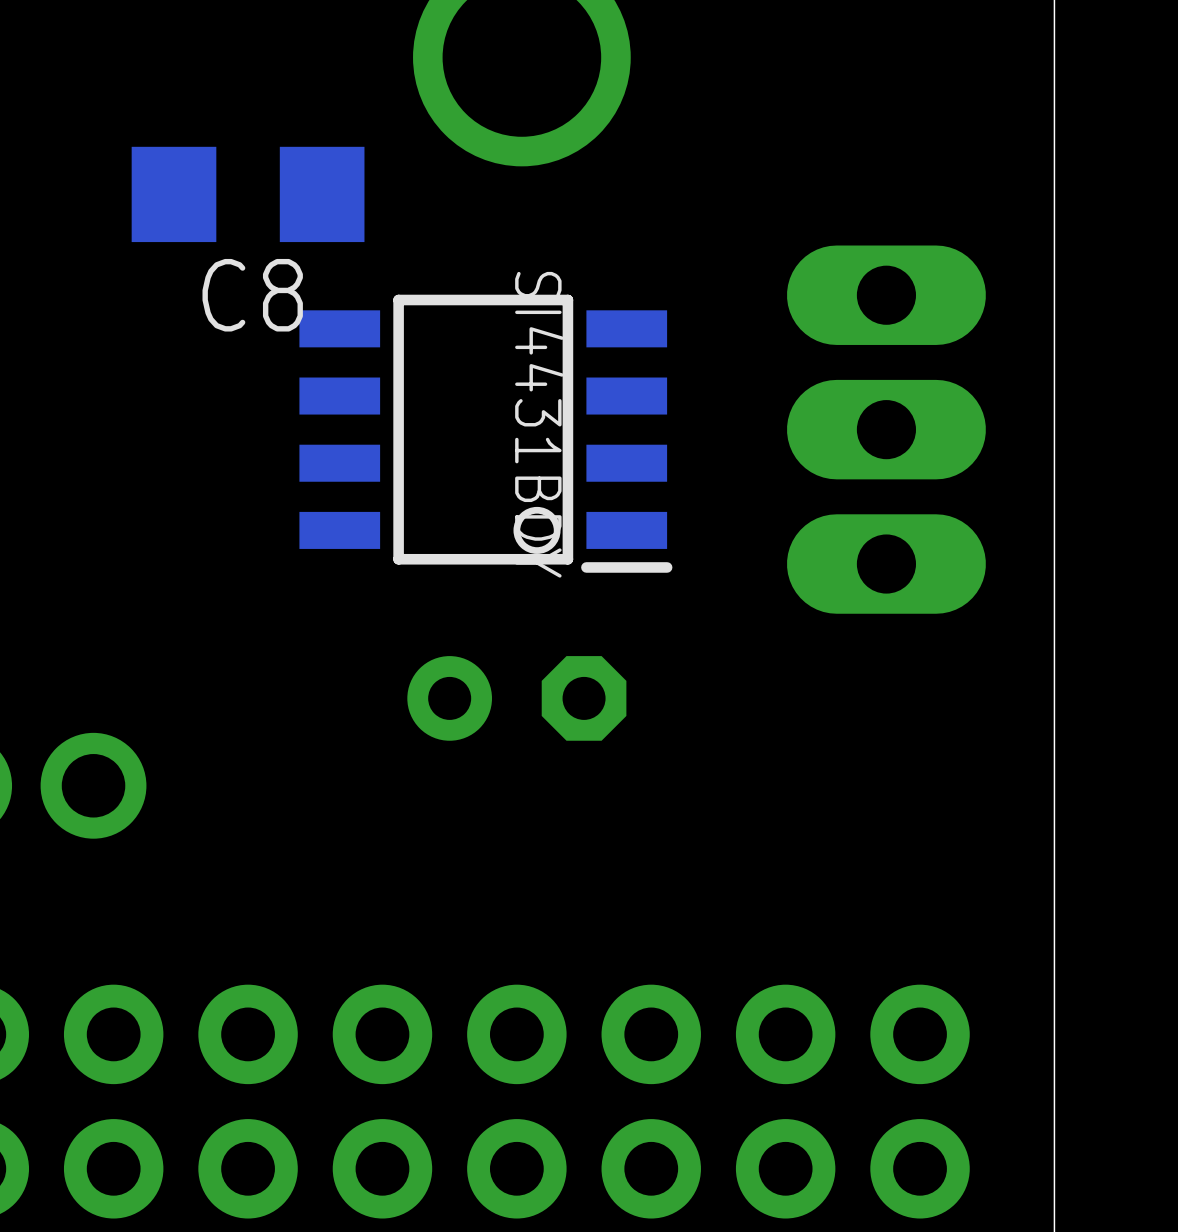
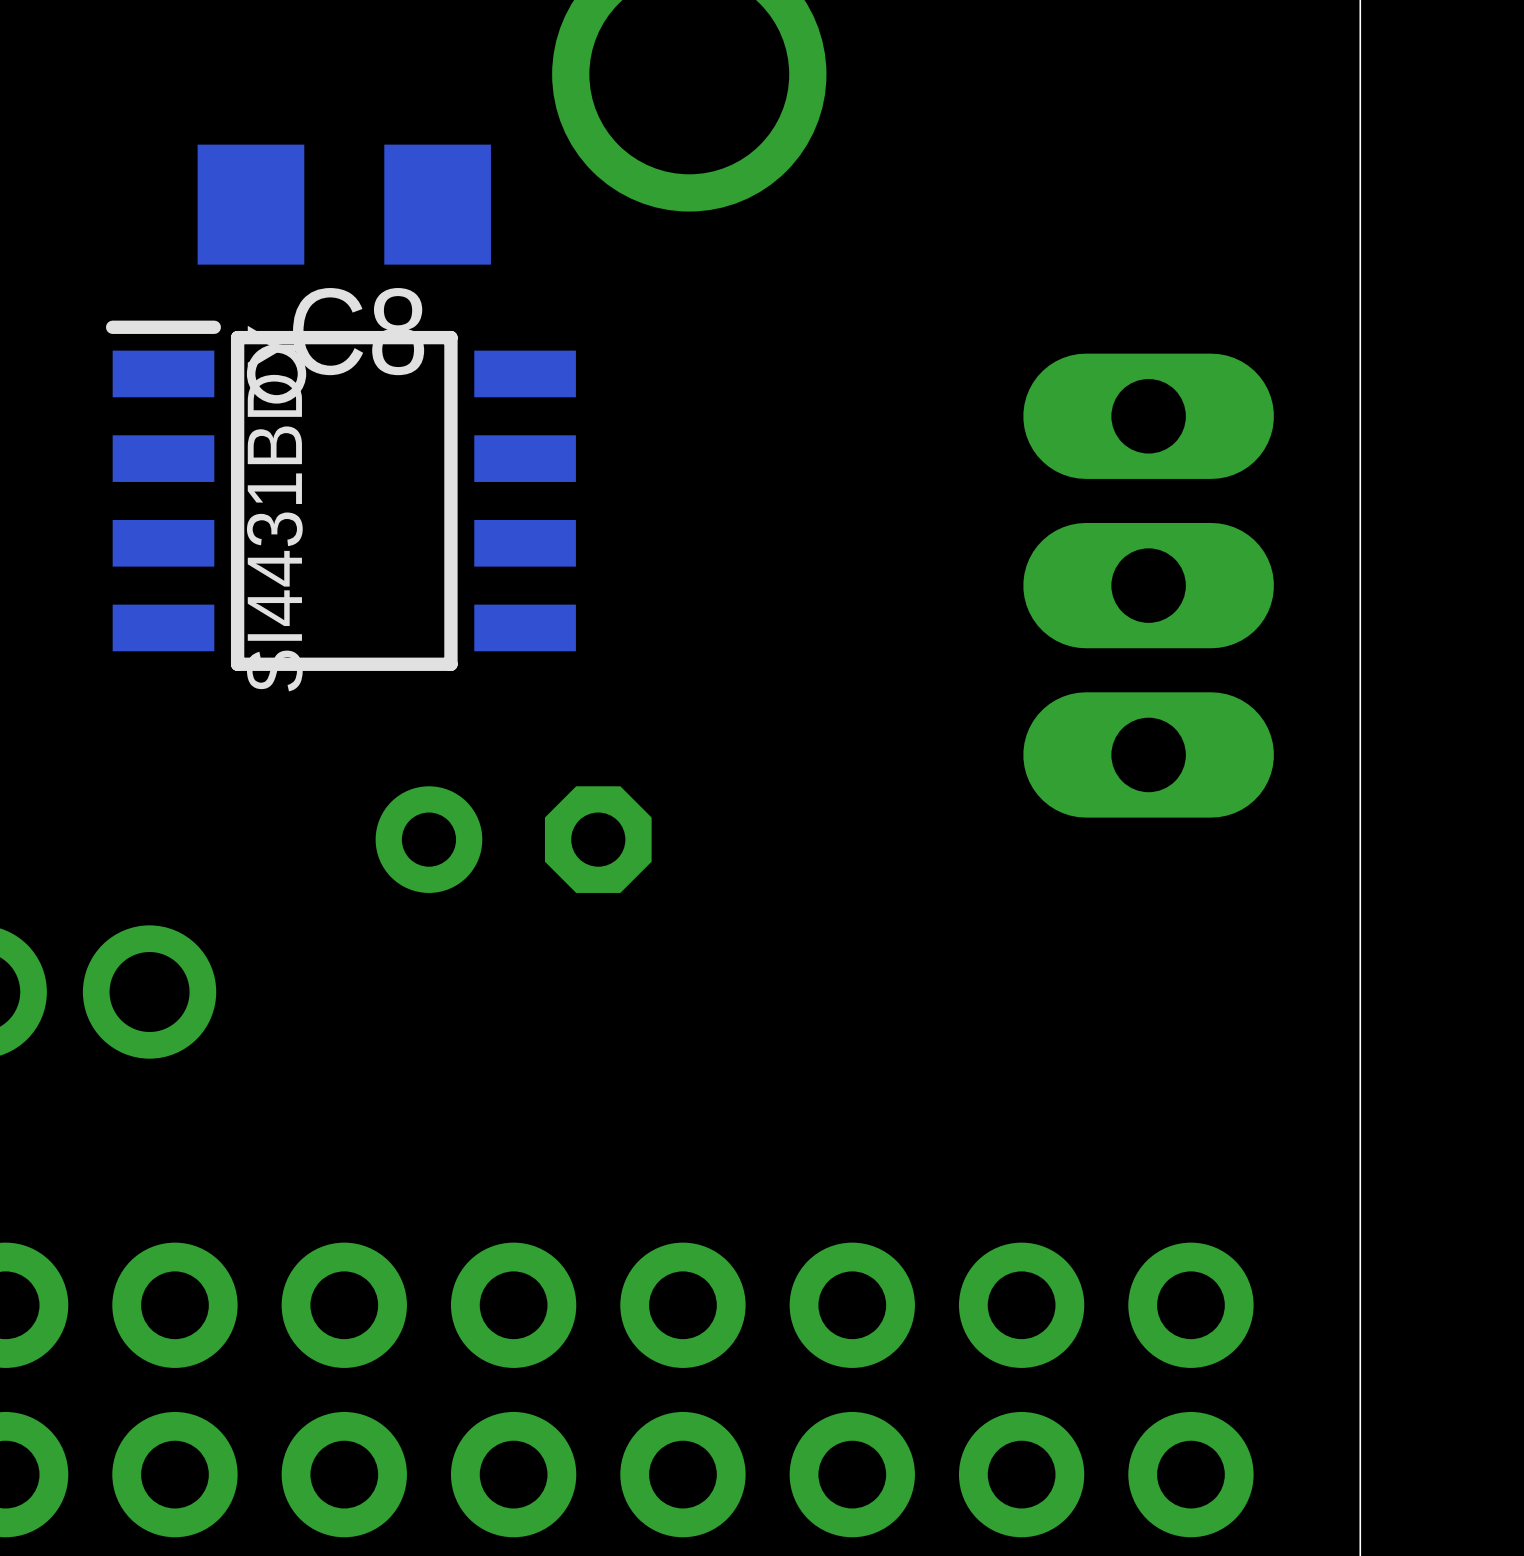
C8 position: (248, 194) -> (344, 204)
part position: (886, 429) -> (1148, 585)
part rotation: 0° (485, 433) -> 180° (340, 495)
part position: (485, 433) -> (340, 495)
part position: (516, 698) -> (513, 839)

